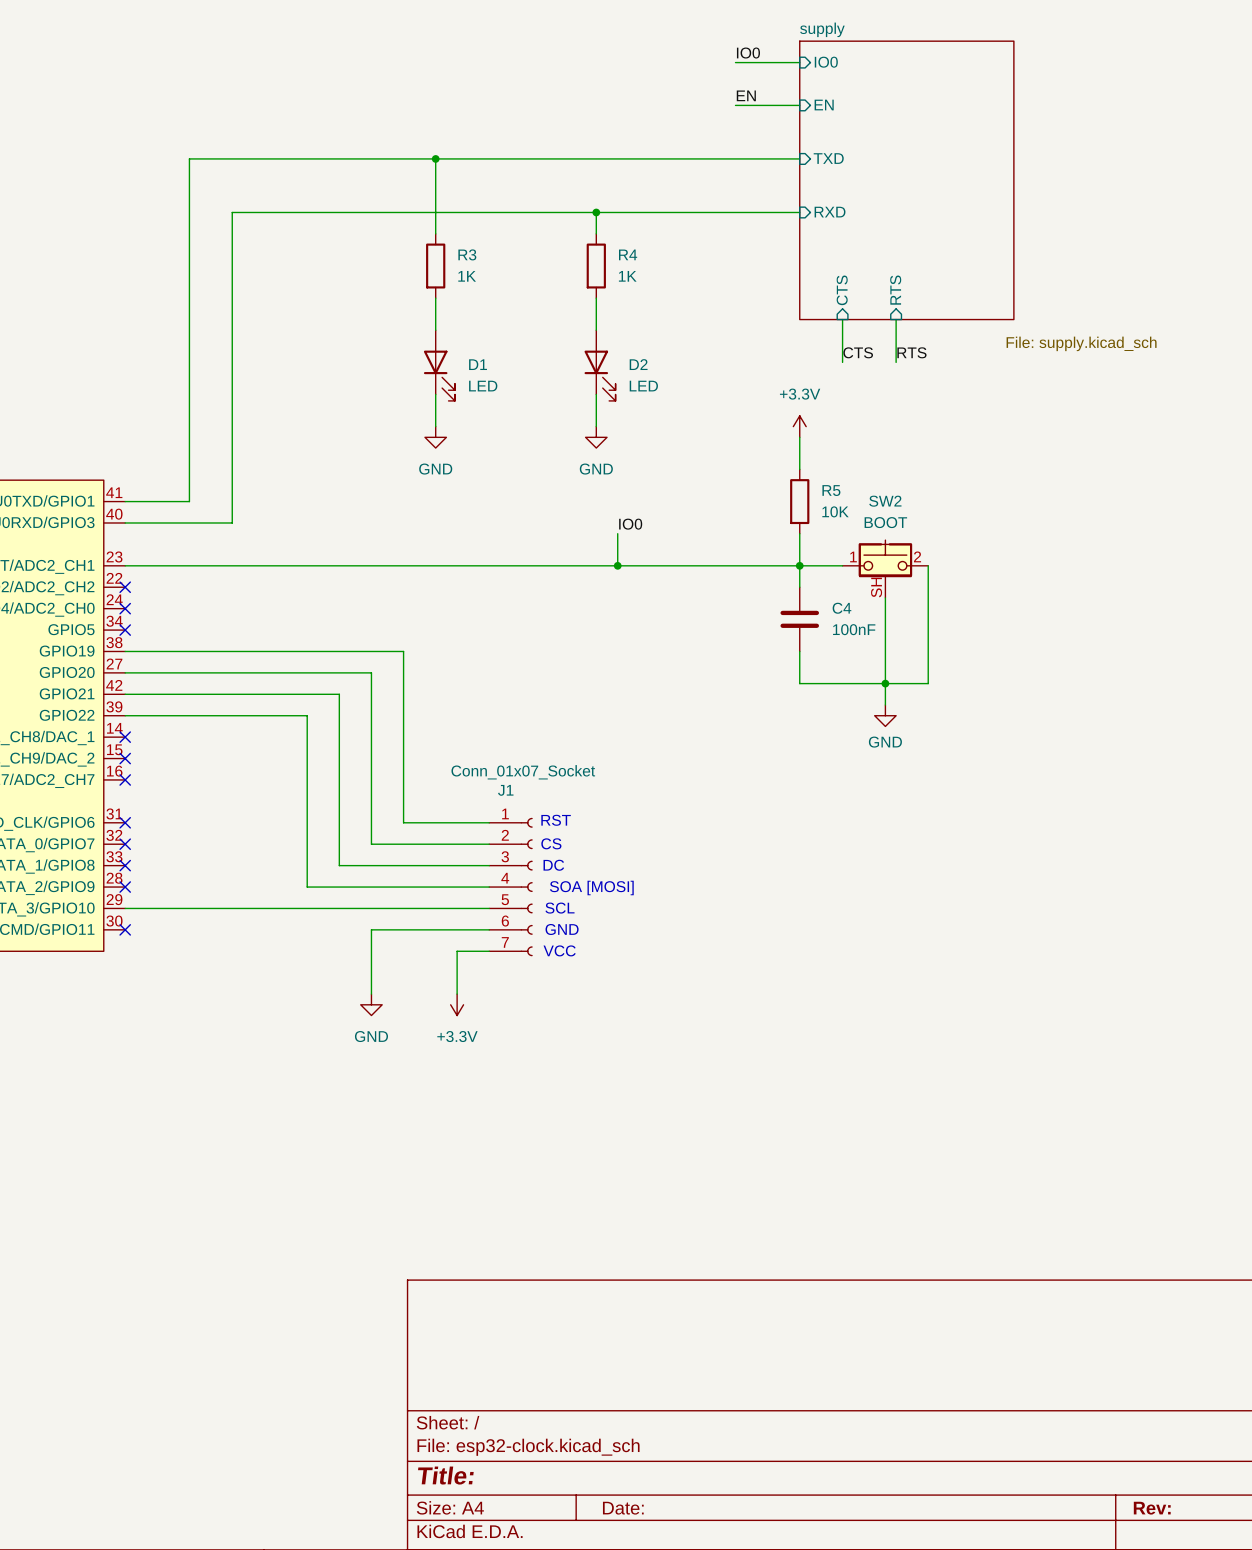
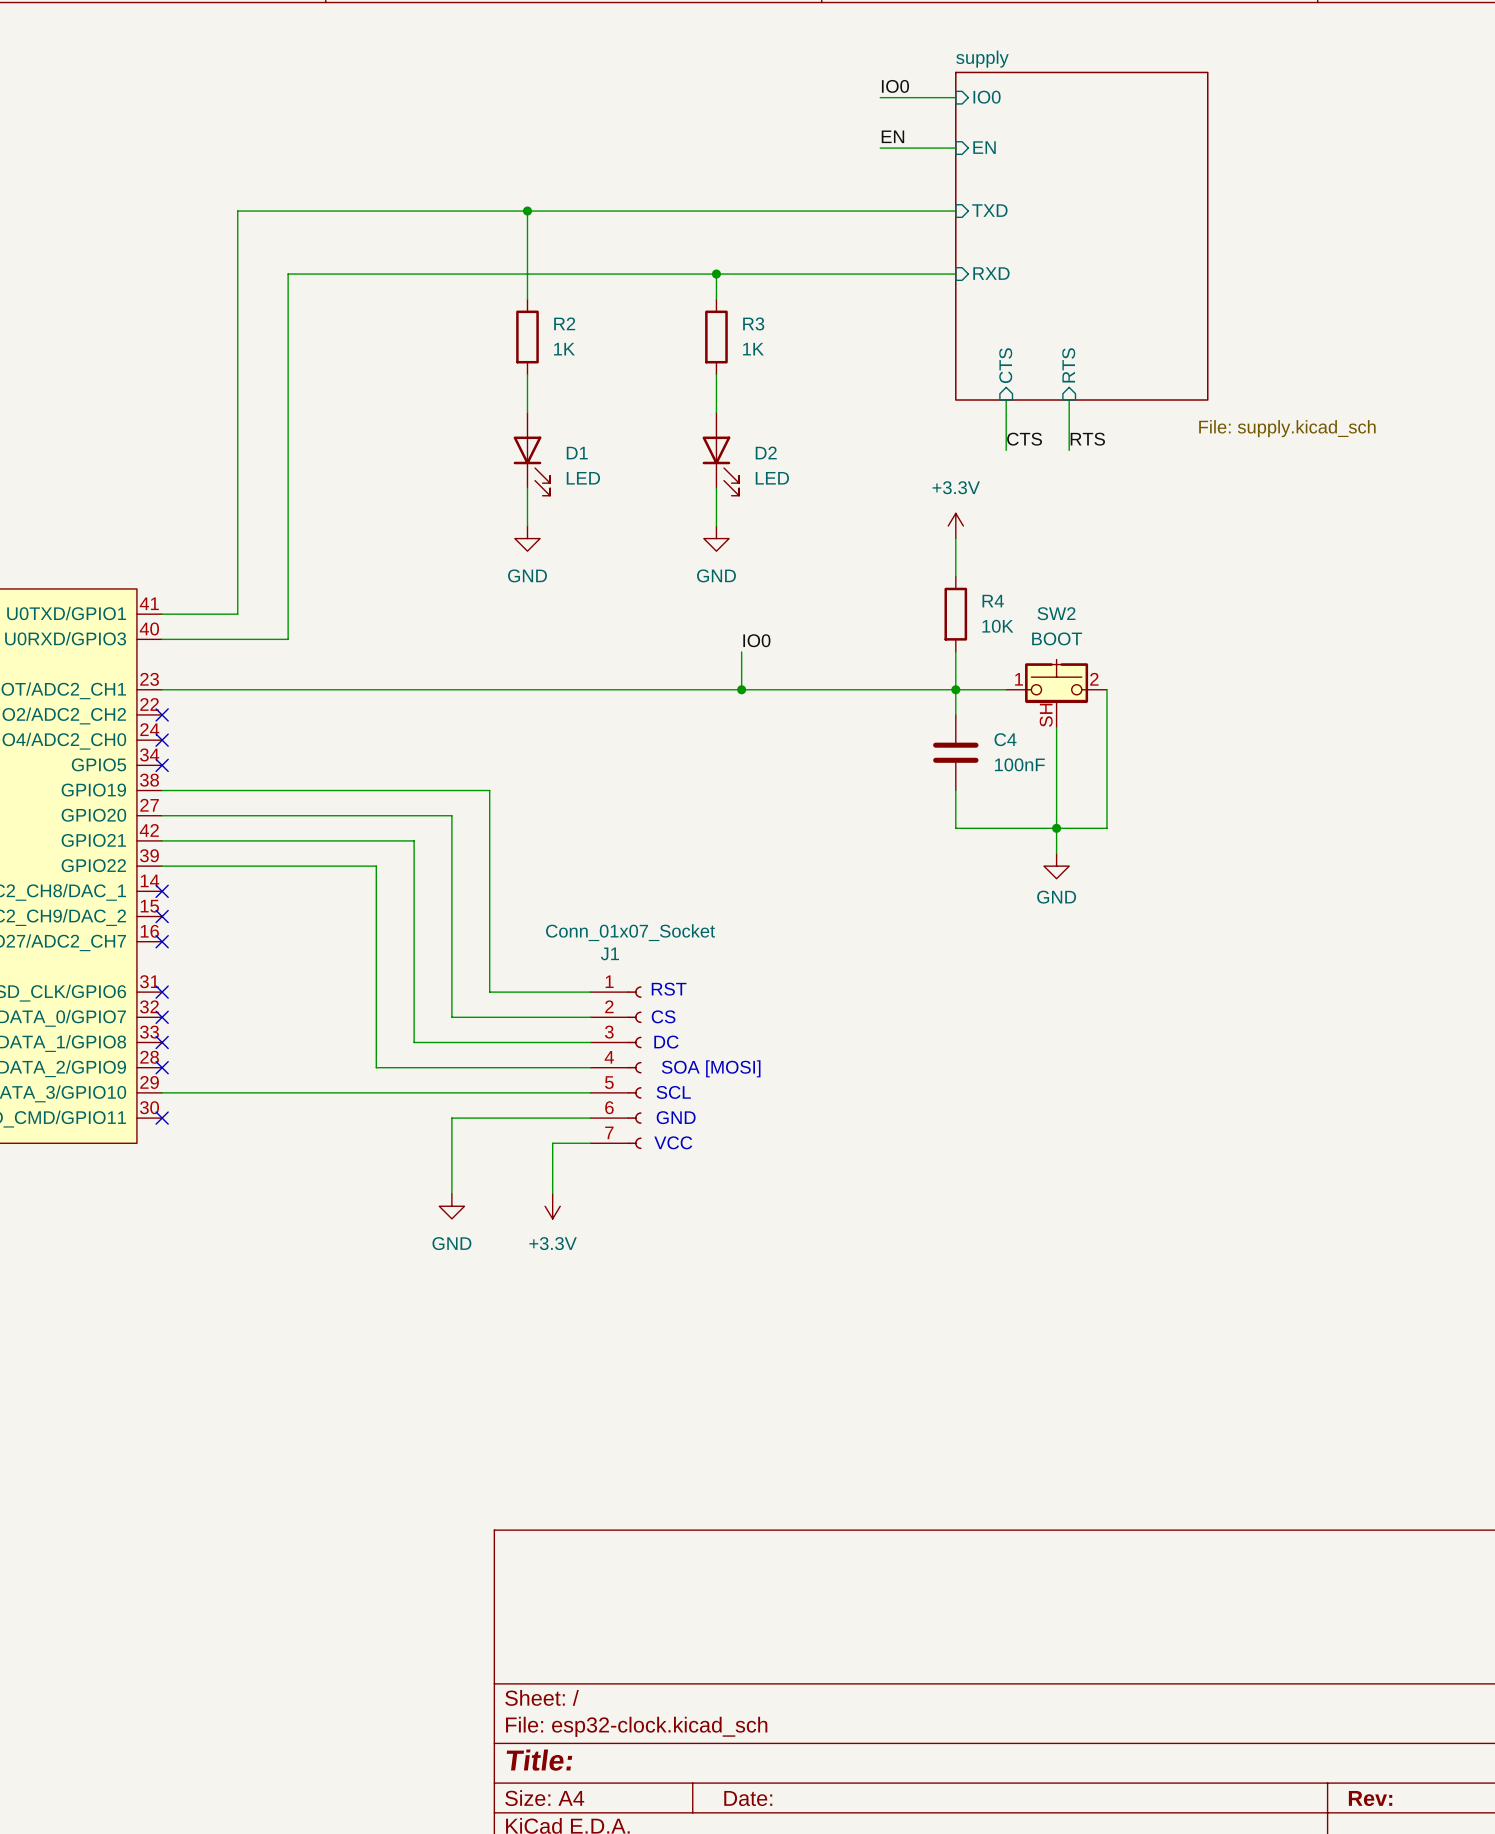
R3 name: R3 (467, 254) -> R2 (564, 323)
R4 name: R4 (628, 254) -> R3 (753, 323)
R5 name: R5 (831, 490) -> R4 (993, 601)

